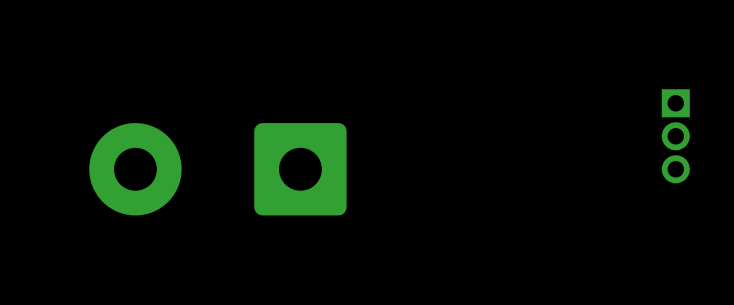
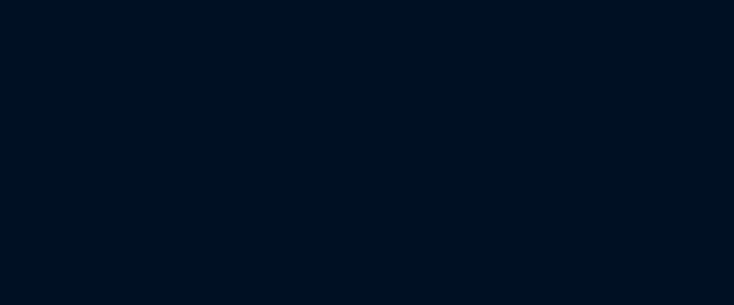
part: (675, 136) -> none
part: (217, 169) -> none

